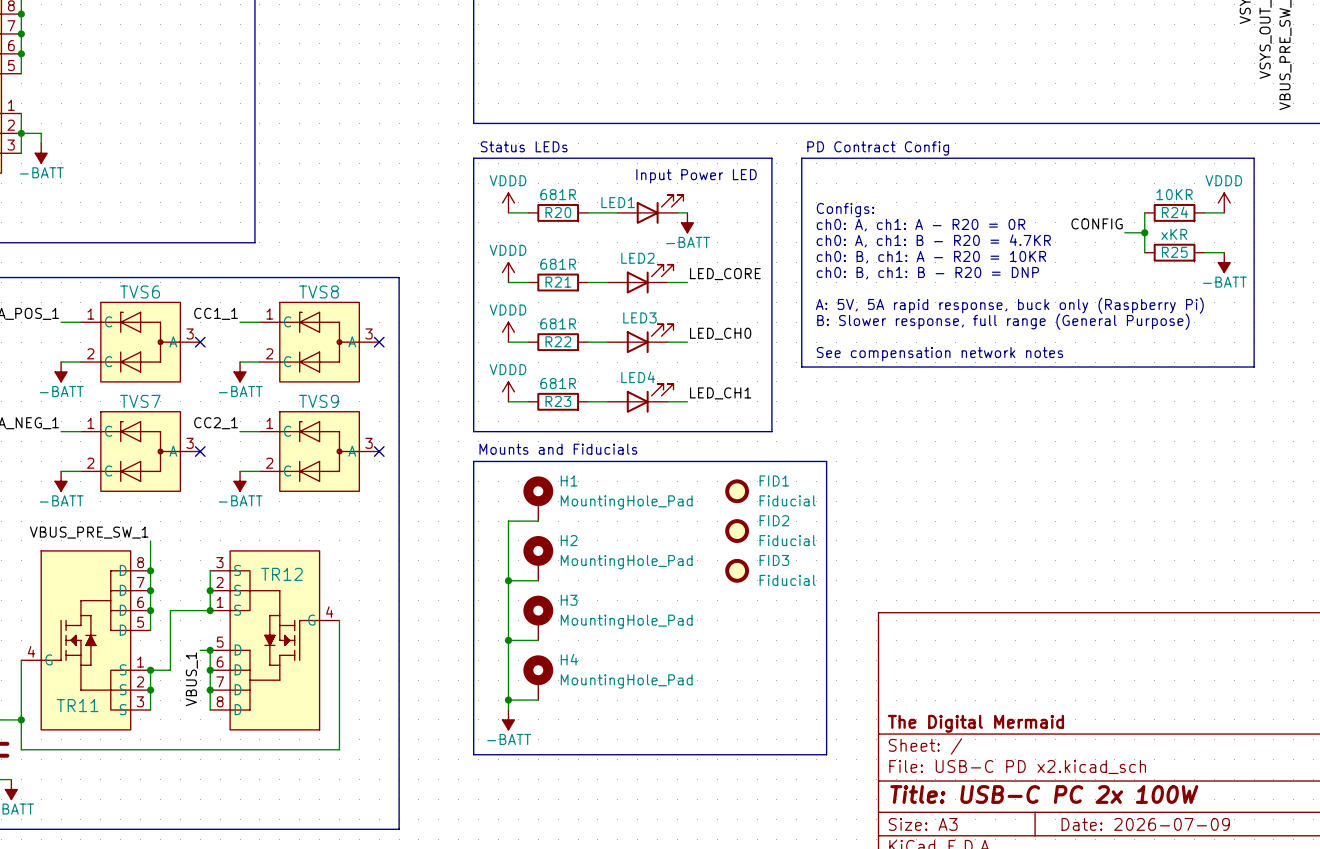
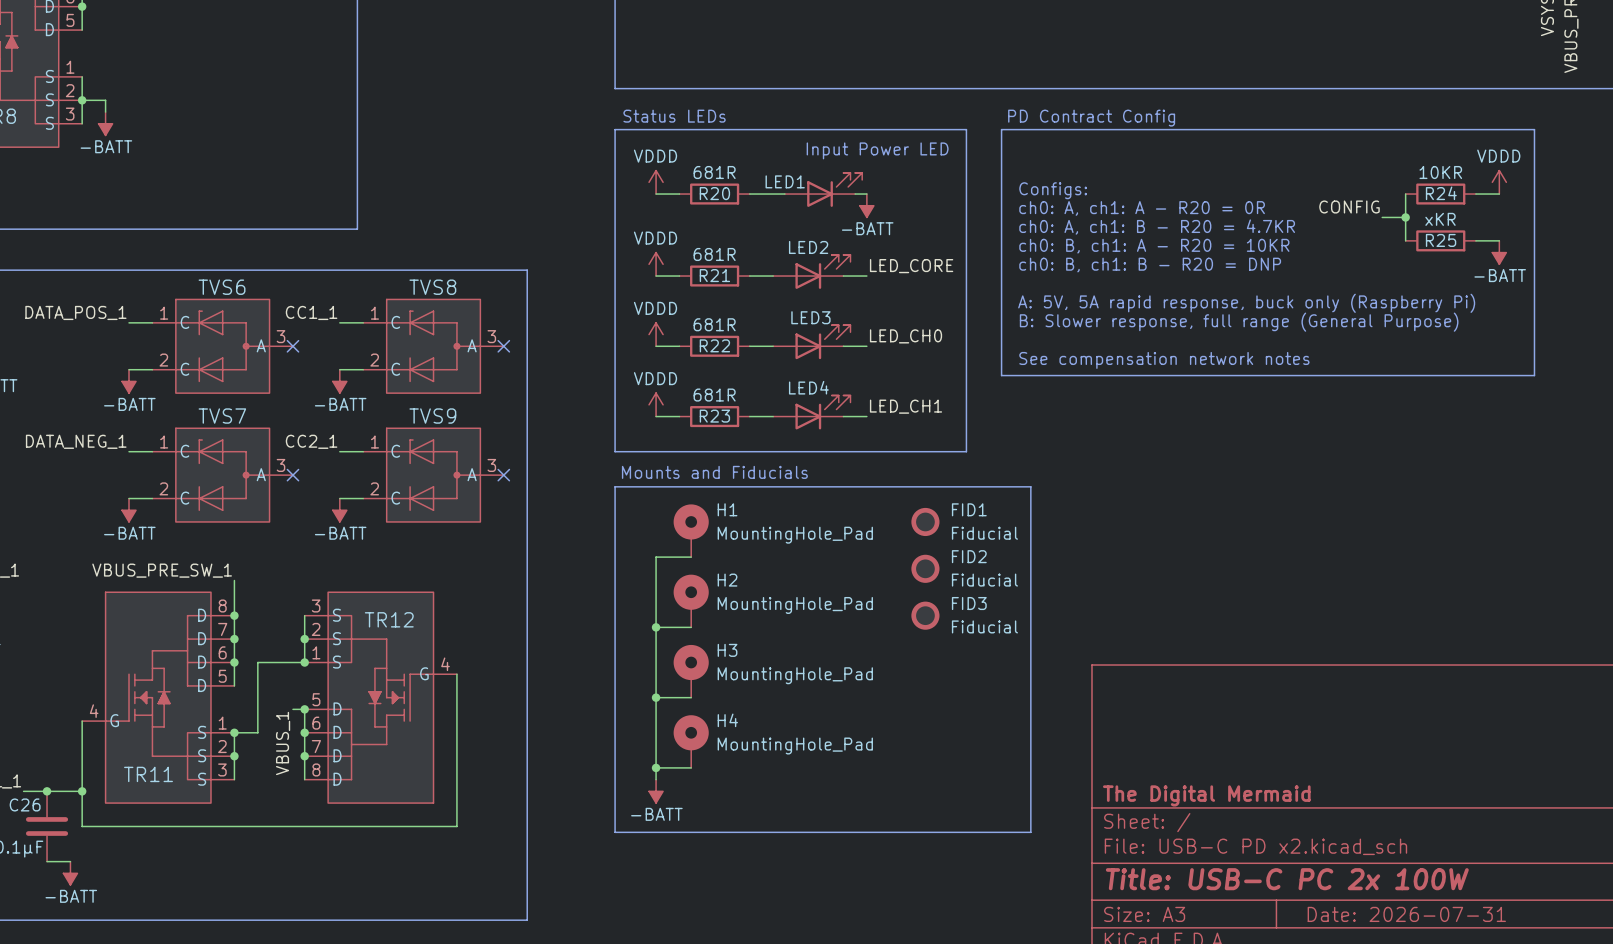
title block: Date: 2026-07-09 (1145, 824) -> Date: 2026-07-31 (1406, 914)

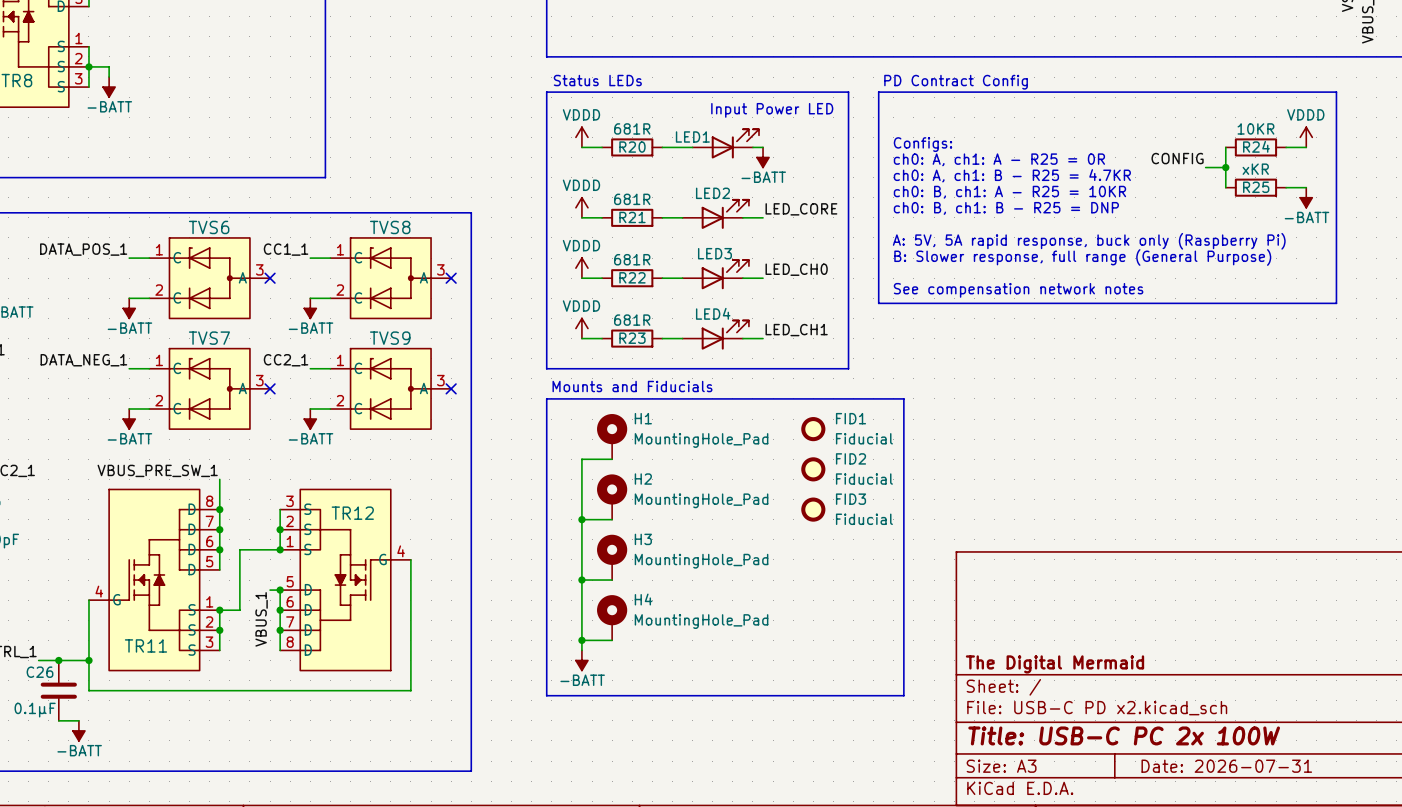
text: ch0: A, ch1: A - R20 = 0R (1142, 208) -> ch0: A, ch1: A - R25 = 0R (999, 159)
text: ch0: A, ch1: B - R20 = 4.7KR (1157, 227) -> ch0: A, ch1: B - R25 = 4.7KR (1012, 175)
text: ch0: B, ch1: A - R20 = 10KR (1154, 246) -> ch0: B, ch1: A - R25 = 10KR (1009, 192)
text: ch0: B, ch1: B - R20 = DNP (1150, 265) -> ch0: B, ch1: B - R25 = DNP (1006, 208)

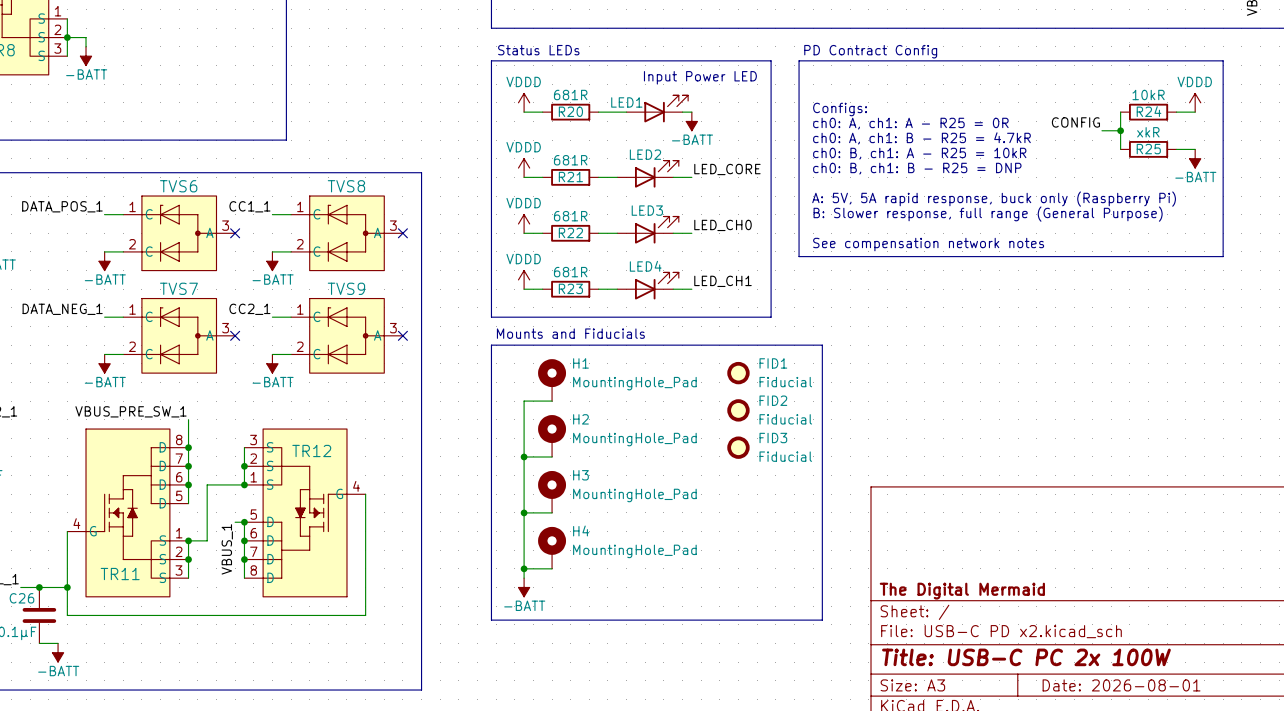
R24 value: 10KR (1255, 128) -> 10kR (1148, 95)
R25 value: xKR (1255, 169) -> xkR (1148, 132)
text: ch0: A, ch1: B - R25 = 4.7KR (1012, 175) -> ch0: A, ch1: B - R25 = 4.7kR (921, 138)
text: ch0: B, ch1: A - R25 = 10KR (1009, 192) -> ch0: B, ch1: A - R25 = 10kR (919, 153)
title block: Date: 2026-07-31 (1226, 766) -> Date: 2026-08-01 (1121, 685)

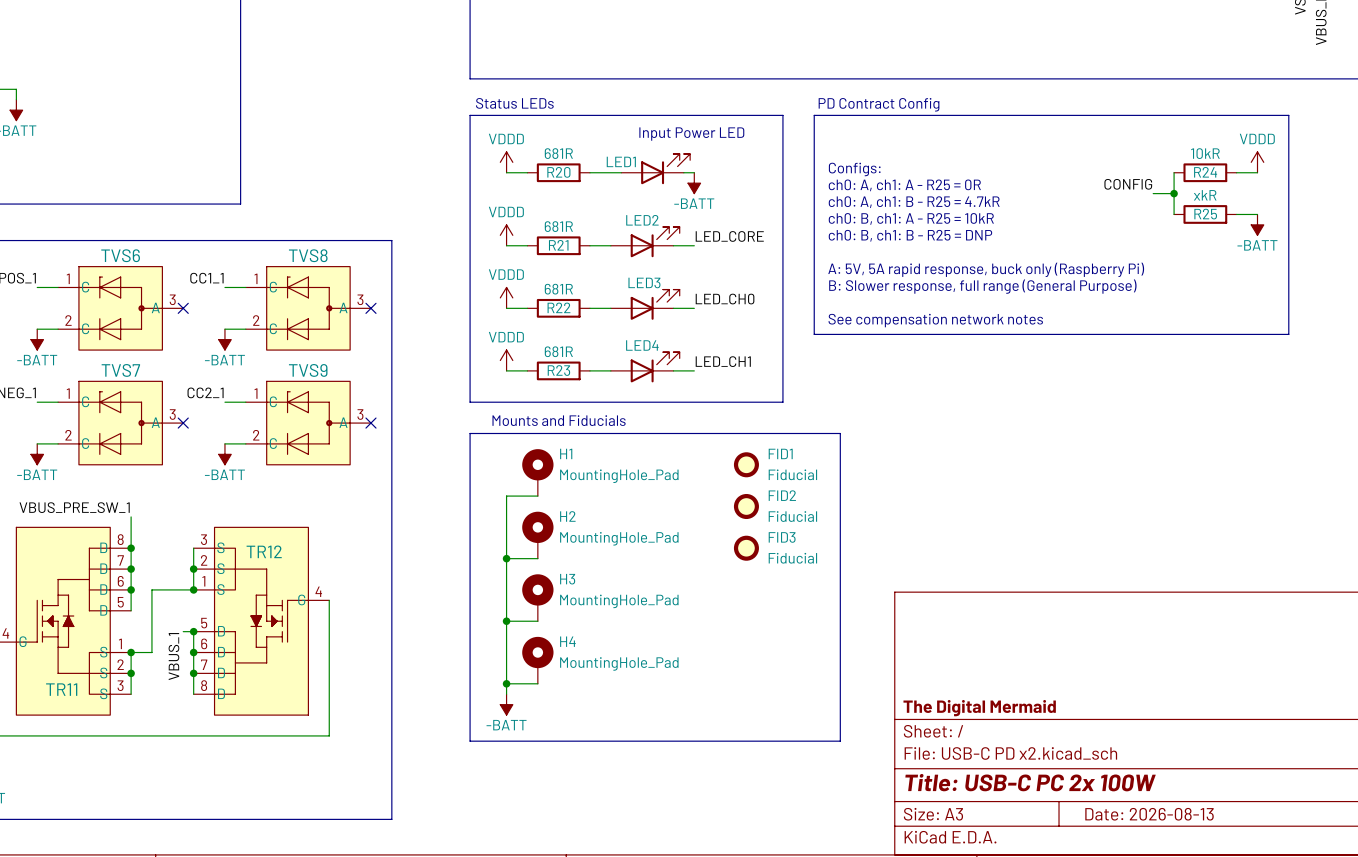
title block: Date: 2026-08-01 (1121, 685) -> Date: 2026-08-13 (1149, 814)

